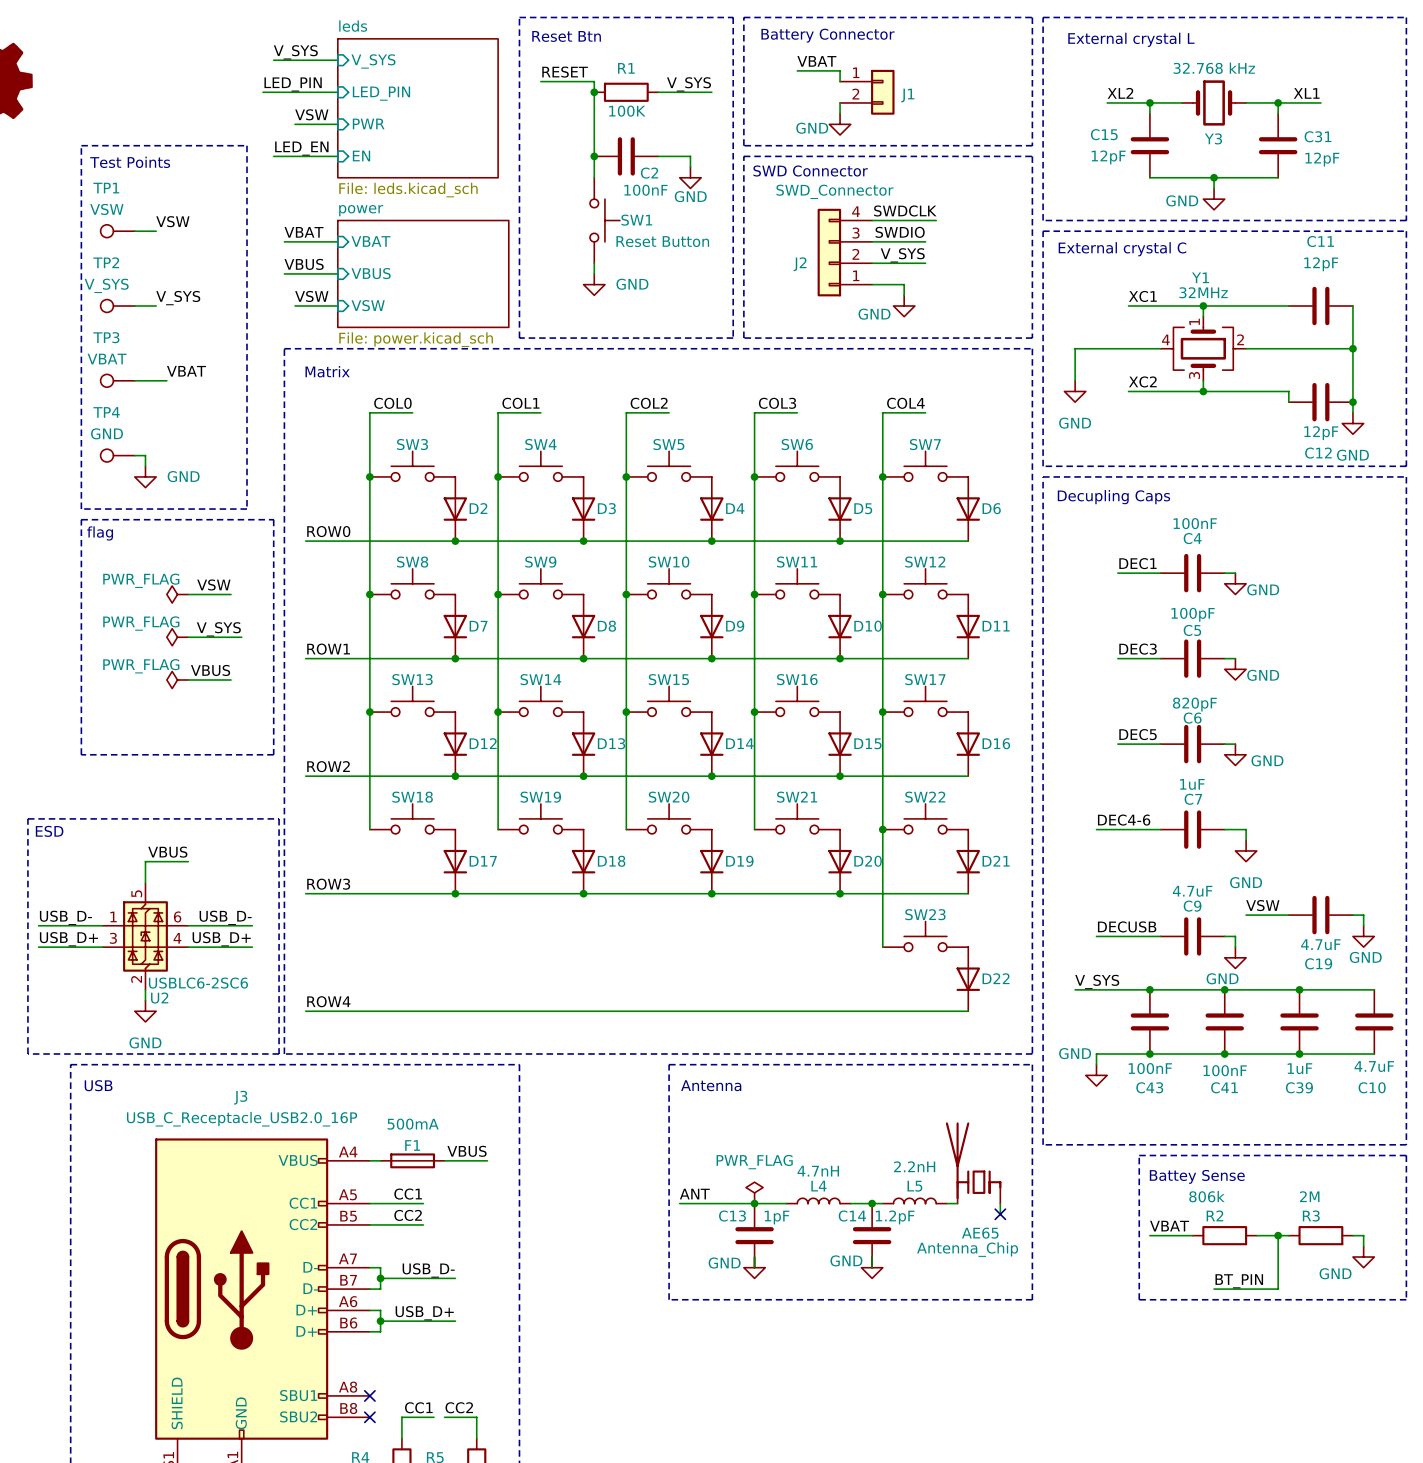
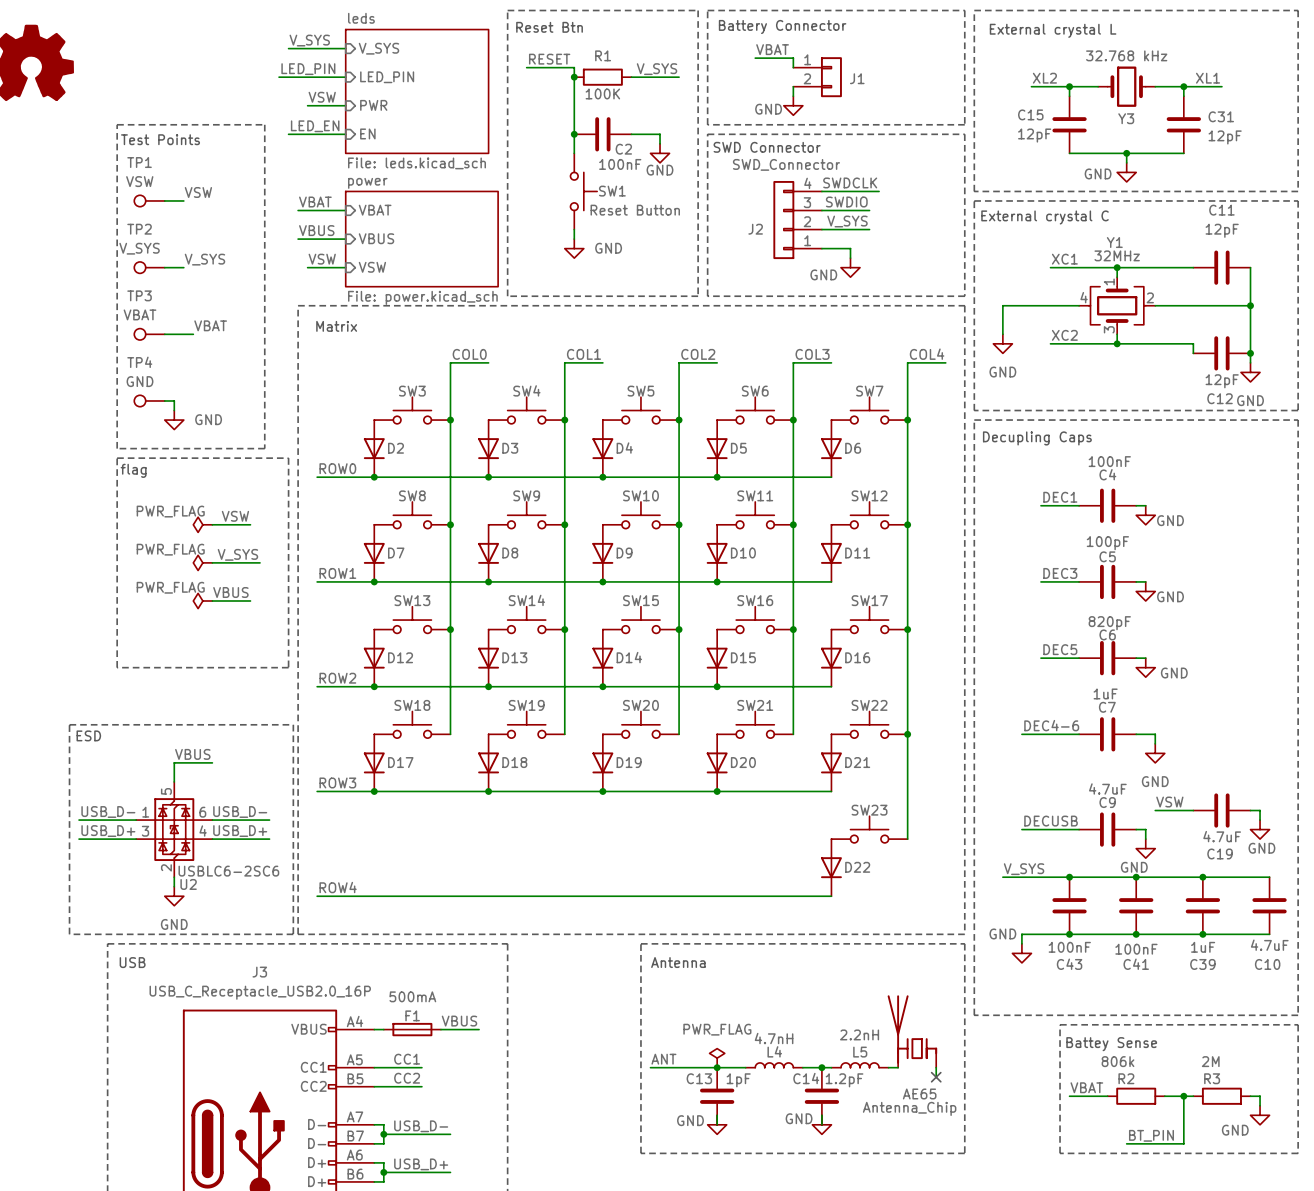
label position: COL0 (392, 403) -> COL0 (469, 354)
label position: COL1 (520, 403) -> COL1 (583, 354)
label position: COL2 (649, 403) -> COL2 (698, 354)
label position: COL3 (777, 403) -> COL3 (812, 354)
label position: COL4 (905, 403) -> COL4 (927, 354)
wire: (412, 412) (369, 412) (369, 829) -> (488, 362) (450, 362) (450, 734)
wire: (540, 412) (498, 412) (498, 829) -> (602, 362) (564, 362) (564, 734)
wire: (669, 412) (626, 412) (626, 829) -> (717, 362) (679, 362) (679, 734)
wire: (797, 412) (754, 412) (754, 829) -> (831, 362) (793, 362) (793, 734)
wire: (925, 412) (882, 412) (882, 947) -> (945, 362) (907, 362) (907, 839)
junction: (369, 476) -> none
junction: none -> (450, 420)
junction: (498, 476) -> none
junction: none -> (564, 420)
junction: (626, 476) -> none
junction: none -> (679, 420)
junction: (754, 476) -> none
junction: none -> (793, 420)
junction: (882, 476) -> none
junction: none -> (907, 420)
D2 position: (455, 509) -> (374, 448)
D3 position: (583, 509) -> (488, 448)
D4 position: (711, 509) -> (602, 448)
D5 position: (840, 509) -> (717, 448)
D6 position: (968, 509) -> (831, 448)
junction: none -> (374, 477)
junction: (455, 541) -> none
junction: none -> (488, 477)
junction: (583, 541) -> none
junction: none -> (602, 477)
junction: (711, 541) -> none
junction: none -> (717, 477)
junction: (840, 541) -> none
wire: (882, 541) (968, 541) -> none
junction: (369, 594) -> none
junction: none -> (450, 524)
junction: (498, 594) -> none
junction: none -> (564, 524)
junction: (626, 594) -> none
junction: none -> (679, 524)
junction: (754, 594) -> none
junction: none -> (793, 524)
junction: (882, 594) -> none
junction: none -> (907, 524)
D7 position: (455, 626) -> (374, 553)
D8 position: (583, 626) -> (488, 553)
D9 position: (711, 626) -> (602, 553)
D10 position: (840, 626) -> (717, 553)
D11 position: (968, 626) -> (831, 553)
junction: none -> (374, 581)
junction: (455, 658) -> none
junction: none -> (488, 581)
junction: (583, 658) -> none
junction: none -> (602, 581)
junction: (711, 658) -> none
junction: none -> (717, 581)
junction: (840, 658) -> none
wire: (882, 658) (968, 658) -> none
junction: (369, 712) -> none
junction: none -> (450, 629)
junction: (498, 712) -> none
junction: none -> (564, 629)
junction: (626, 712) -> none
junction: none -> (679, 629)
junction: (754, 712) -> none
junction: none -> (793, 629)
junction: (882, 712) -> none
junction: none -> (907, 629)
D12 position: (455, 744) -> (374, 658)
D13 position: (583, 744) -> (488, 658)
D14 position: (711, 744) -> (602, 658)
D15 position: (840, 744) -> (717, 658)
D16 position: (968, 744) -> (831, 658)
junction: none -> (374, 686)
junction: (455, 776) -> none
junction: none -> (488, 686)
junction: (583, 776) -> none
junction: none -> (602, 686)
junction: (711, 776) -> none
junction: none -> (717, 686)
junction: (840, 776) -> none
wire: (882, 776) (968, 776) -> none
junction: (882, 829) -> none
junction: none -> (907, 734)
D17 position: (455, 861) -> (374, 762)
D18 position: (583, 861) -> (488, 762)
D19 position: (711, 861) -> (602, 762)
D20 position: (840, 861) -> (717, 762)
D21 position: (968, 861) -> (831, 762)
junction: none -> (374, 791)
junction: (455, 893) -> none
junction: none -> (488, 791)
junction: (583, 893) -> none
junction: none -> (602, 791)
junction: (711, 893) -> none
junction: none -> (717, 791)
junction: (840, 893) -> none
wire: (882, 893) (968, 893) -> none
D22 position: (968, 979) -> (831, 867)
wire: (882, 1011) (968, 1011) -> none

